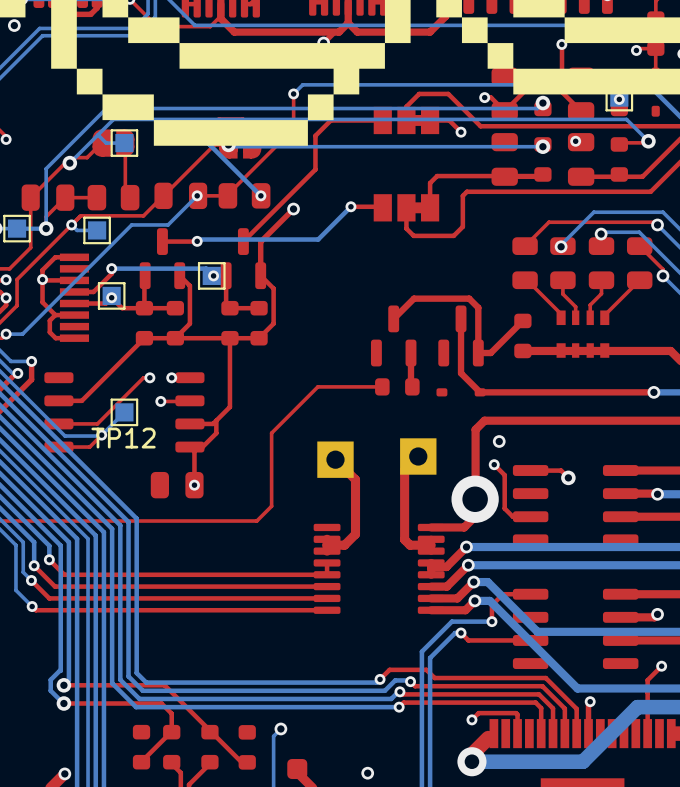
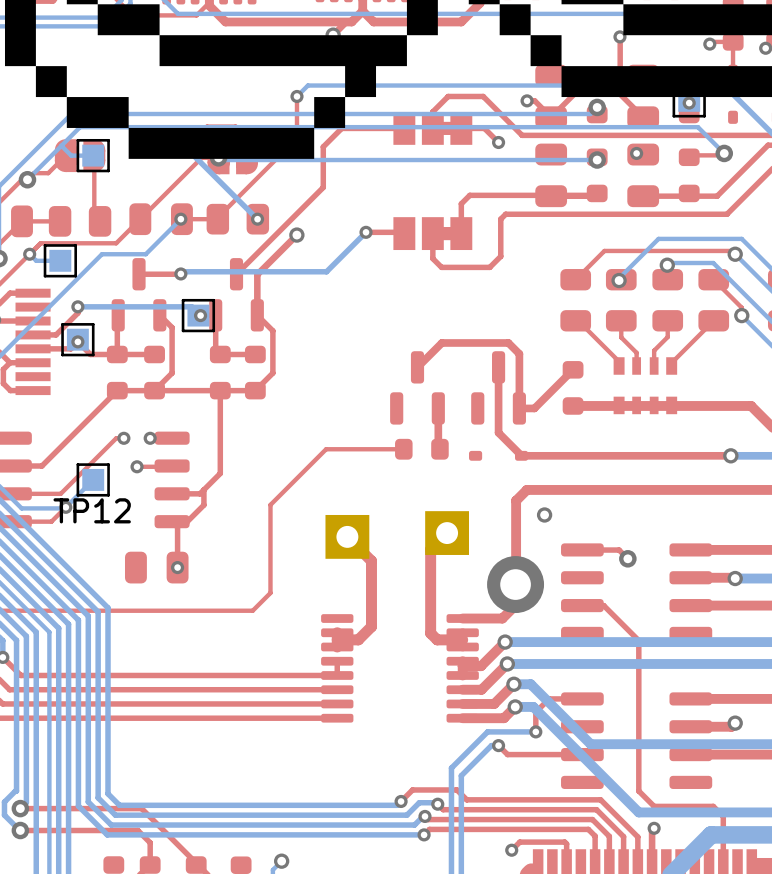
top track: (494, 464) (504, 475) (504, 508) (512, 516) (530, 516) -> none
via: (494, 464) -> none
top track: (661, 666) (647, 680) (647, 691) -> (582, 605) (603, 605) (638, 640) (638, 791) (654, 806) (713, 806) (723, 816)
via: (661, 666) -> none

